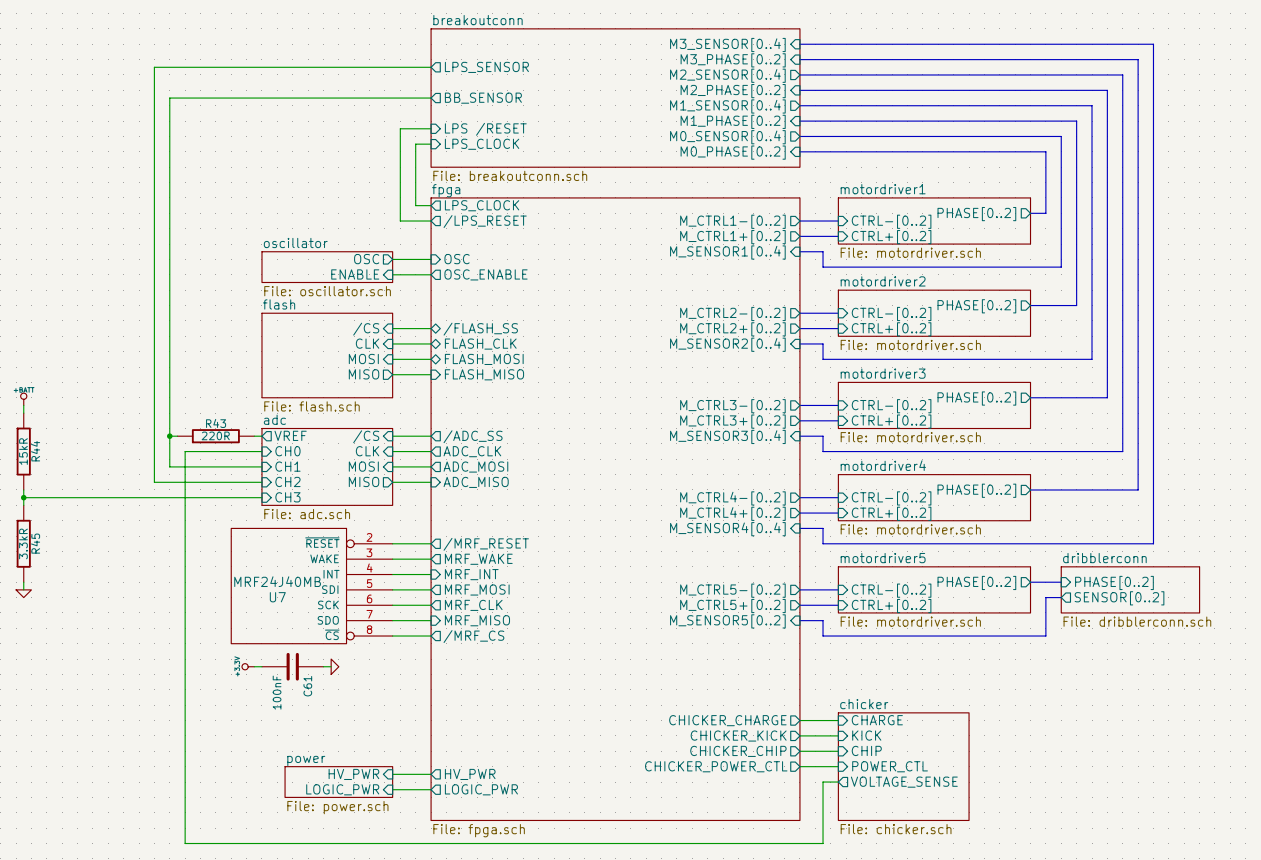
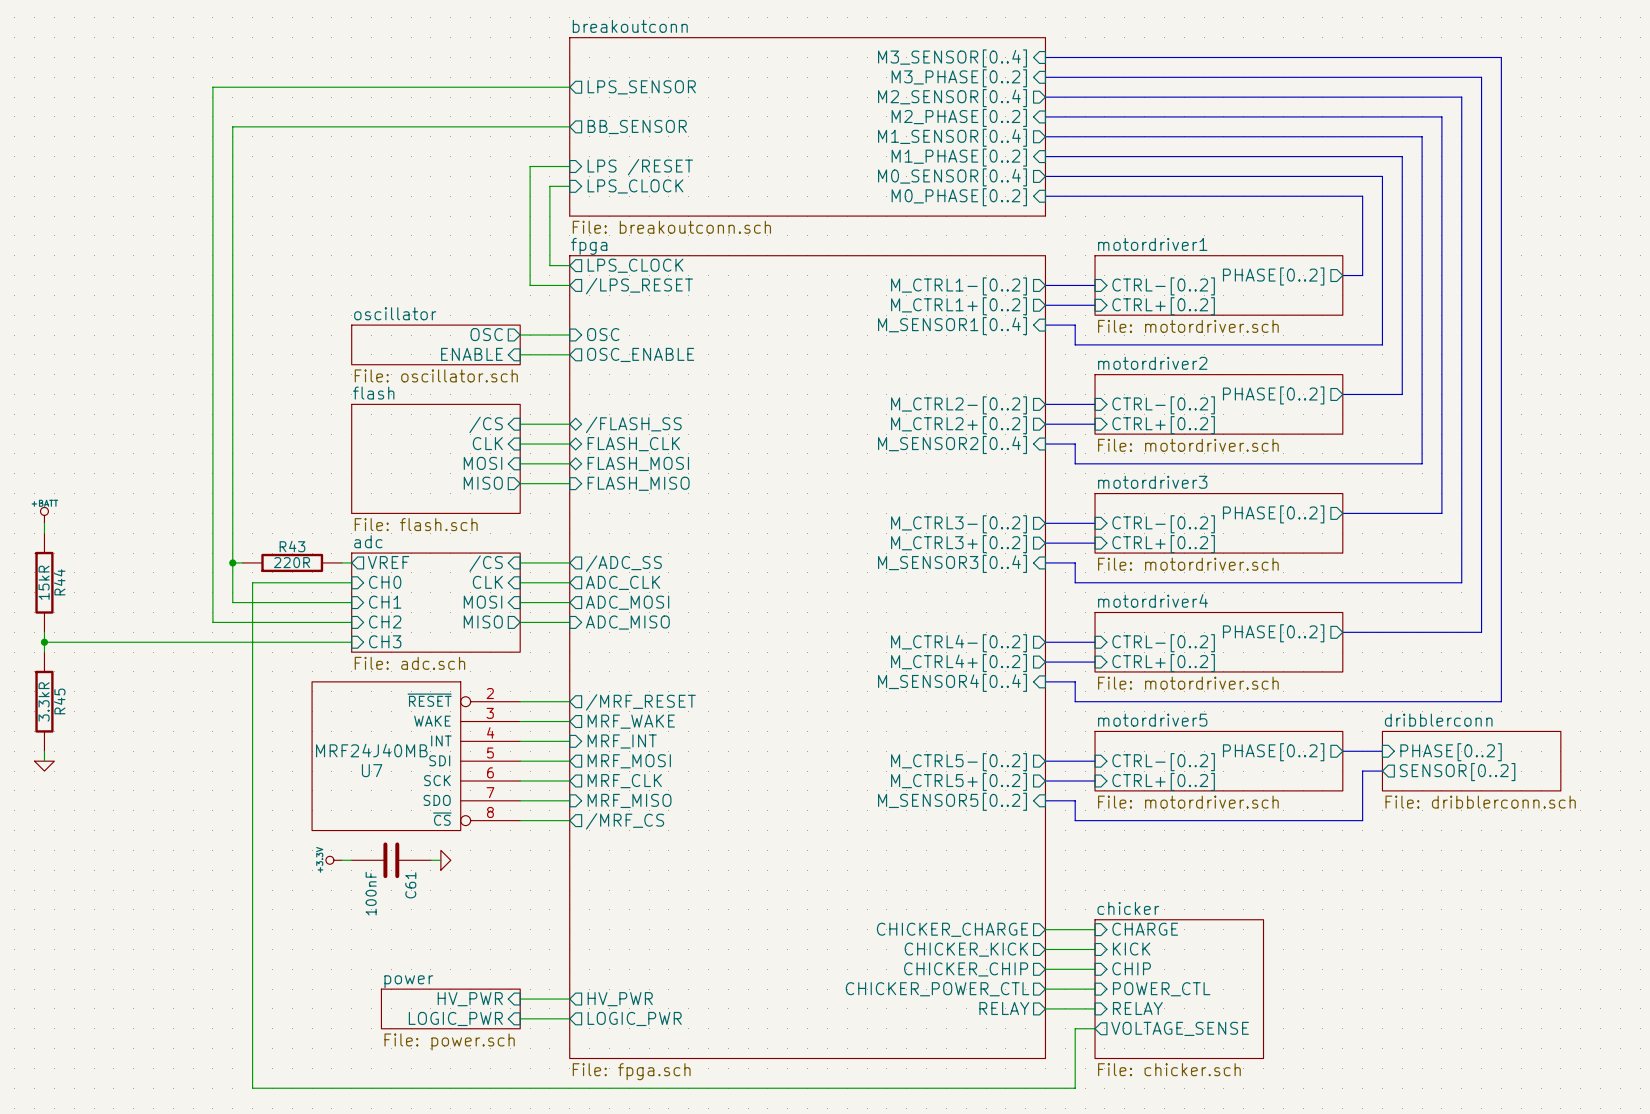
sheet pin: none -> RELAY (1004, 1008)
wire: none -> (1045, 1008) (1075, 1008)
wire: (823, 782) (823, 797) -> (1095, 1028) (1075, 1028)
sheet pin shape: output (904, 782) -> input (1137, 1008)
sheet pin: VOLTAGE_SENSE (904, 782) -> RELAY (1137, 1008)
sheet pin: none -> VOLTAGE_SENSE (1180, 1028)

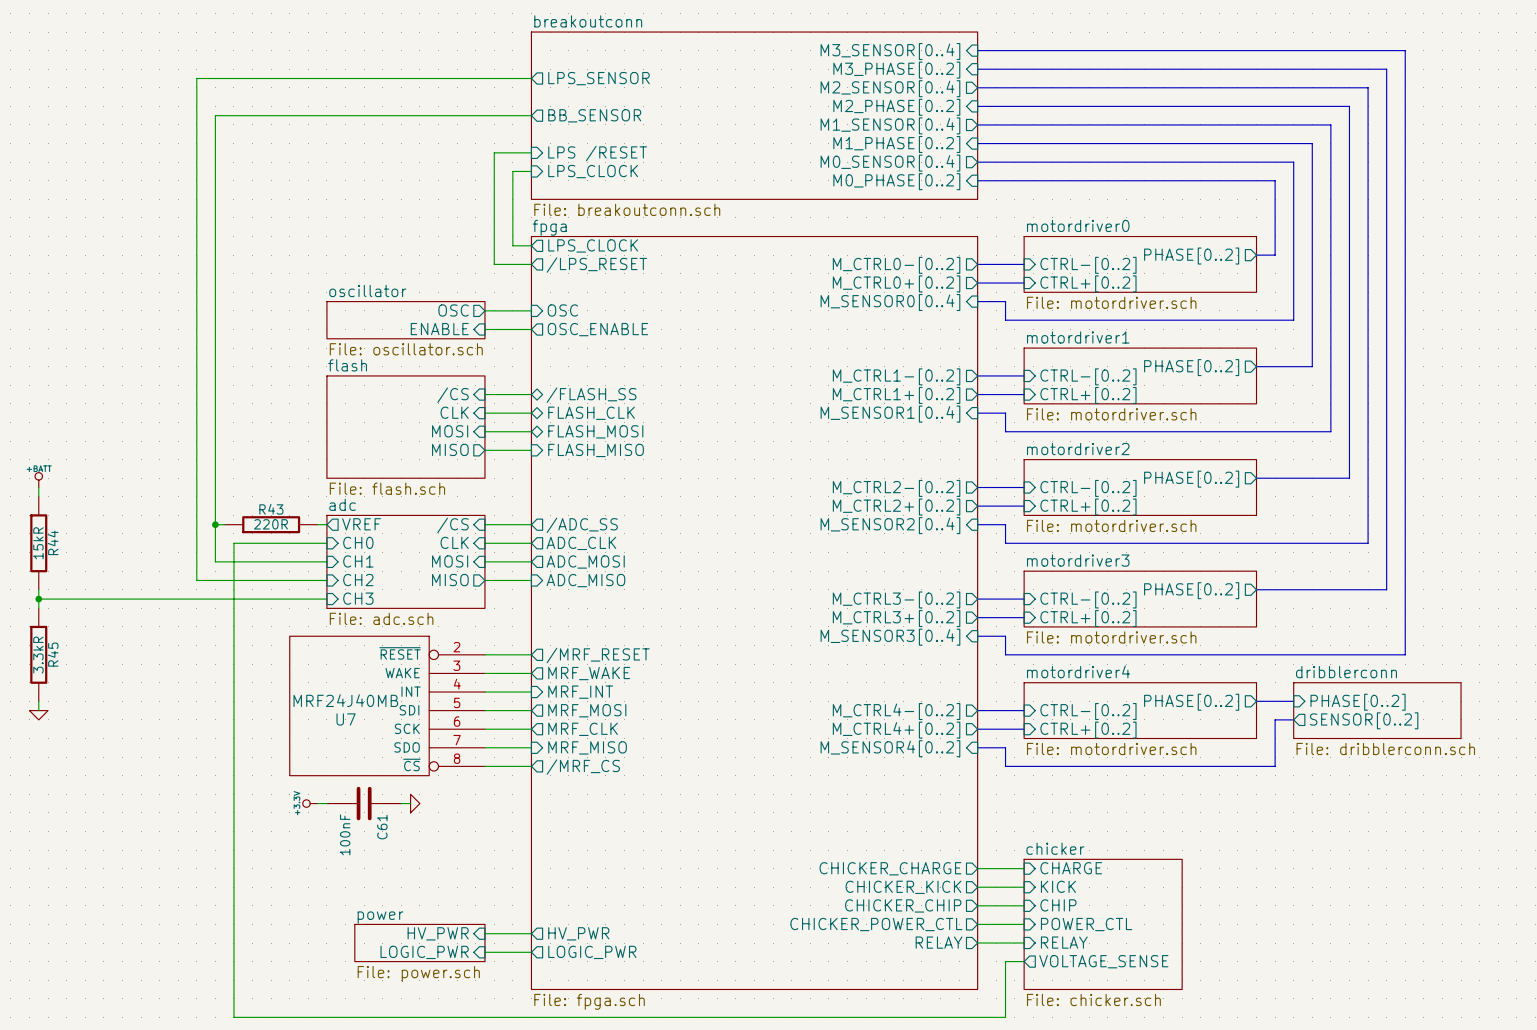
sheet motordriver1 name: motordriver1 (1152, 244) -> motordriver0 (1078, 225)
sheet pin: M_CTRL1-[0..2] (959, 286) -> M_CTRL0-[0..2] (896, 265)
sheet pin: M_CTRL1+[0..2] (959, 306) -> M_CTRL0+[0..2] (896, 283)
sheet pin: M_SENSOR1[0..4] (952, 326) -> M_SENSOR0[0..4] (890, 302)
sheet motordriver2 name: motordriver2 (1152, 363) -> motordriver1 (1078, 337)
sheet pin: M_CTRL2-[0..2] (959, 405) -> M_CTRL1-[0..2] (896, 376)
sheet pin: M_CTRL2+[0..2] (959, 425) -> M_CTRL1+[0..2] (896, 395)
sheet pin: M_SENSOR2[0..4] (952, 444) -> M_SENSOR1[0..4] (890, 414)
sheet motordriver3 name: motordriver3 (1152, 482) -> motordriver2 (1078, 449)
sheet pin: M_CTRL3-[0..2] (959, 524) -> M_CTRL2-[0..2] (896, 488)
sheet pin: M_CTRL3+[0..2] (959, 544) -> M_CTRL2+[0..2] (896, 507)
sheet pin: M_SENSOR3[0..4] (952, 563) -> M_SENSOR2[0..4] (890, 525)
sheet motordriver4 name: motordriver4 (1153, 600) -> motordriver3 (1078, 560)
sheet pin: M_CTRL4-[0..2] (959, 643) -> M_CTRL3-[0..2] (896, 599)
sheet pin: M_CTRL4+[0..2] (959, 663) -> M_CTRL3+[0..2] (896, 618)
sheet pin: M_SENSOR4[0..4] (952, 682) -> M_SENSOR3[0..4] (890, 637)
sheet motordriver5 name: motordriver5 (1152, 720) -> motordriver4 (1078, 671)
sheet pin: M_CTRL5-[0..2] (959, 762) -> M_CTRL4-[0..2] (896, 711)
sheet pin: M_CTRL5+[0..2] (959, 781) -> M_CTRL4+[0..2] (896, 730)
sheet pin: M_SENSOR5[0..2] (952, 801) -> M_SENSOR4[0..2] (890, 748)

